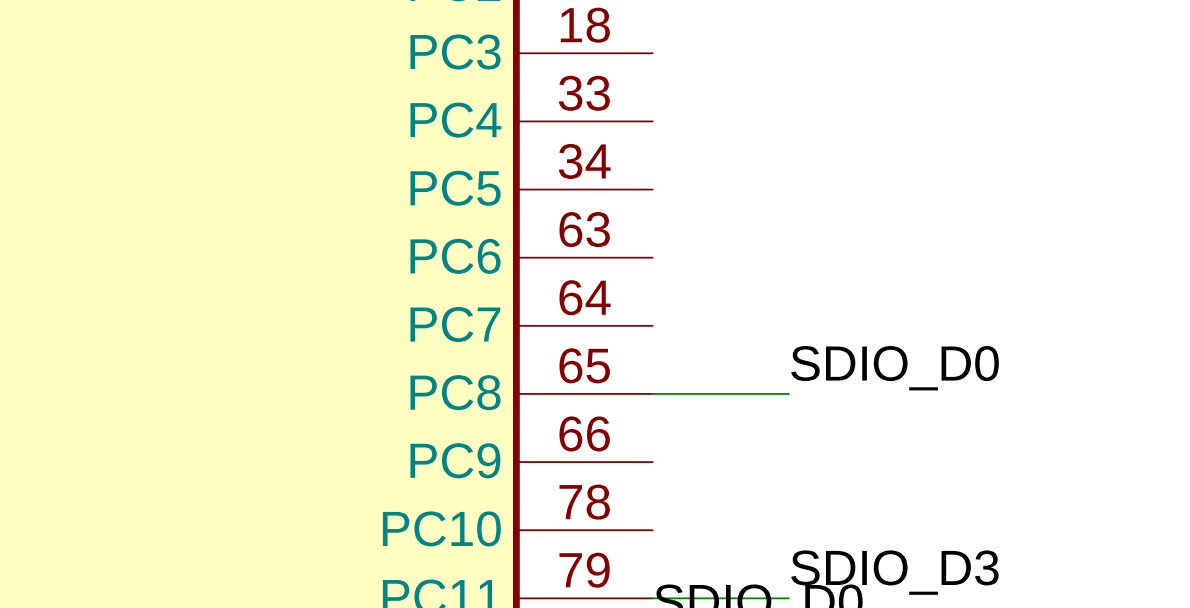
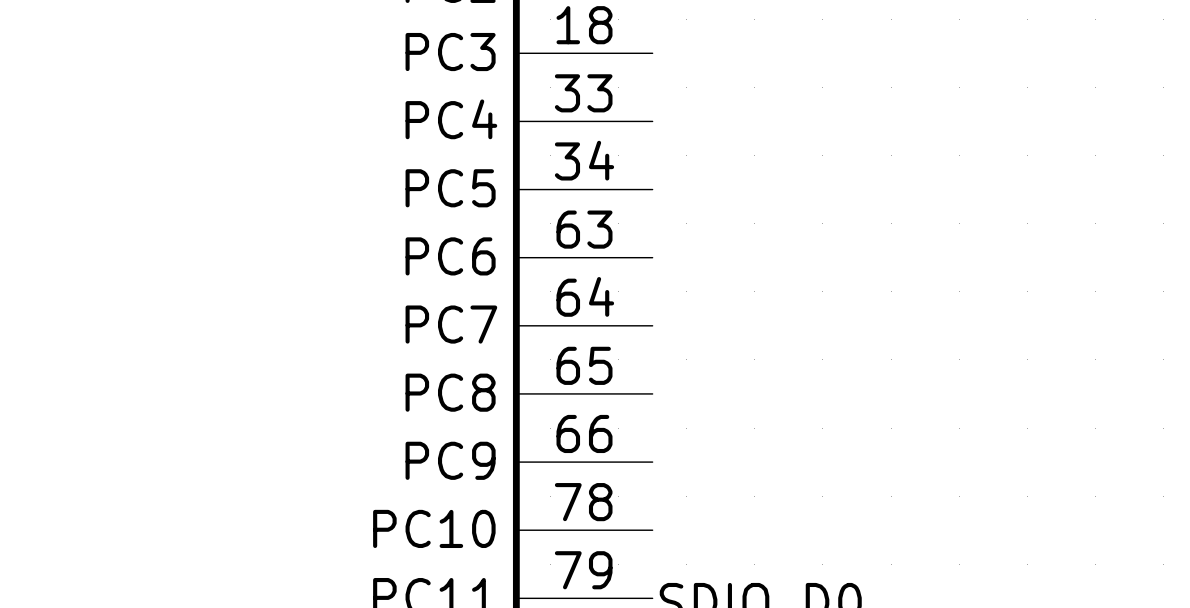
label: SDIO_D0 (894, 368) -> none
wire: (652, 393) (788, 393) -> none
label: SDIO_D3 (894, 572) -> none
wire: (652, 598) (788, 598) -> none

